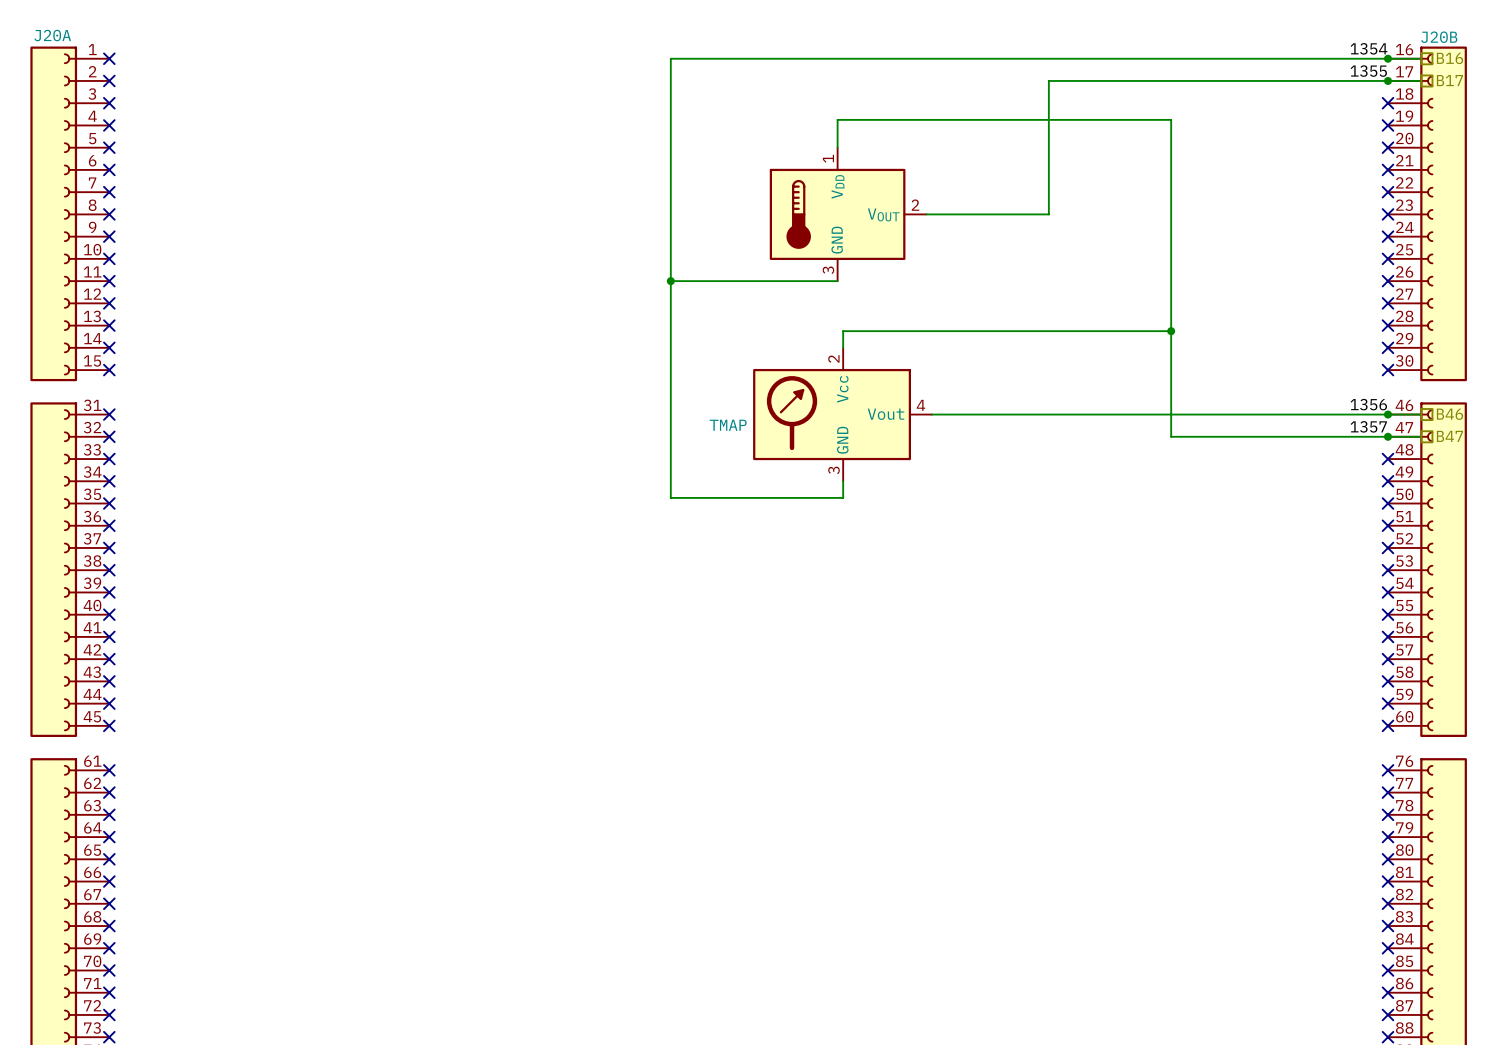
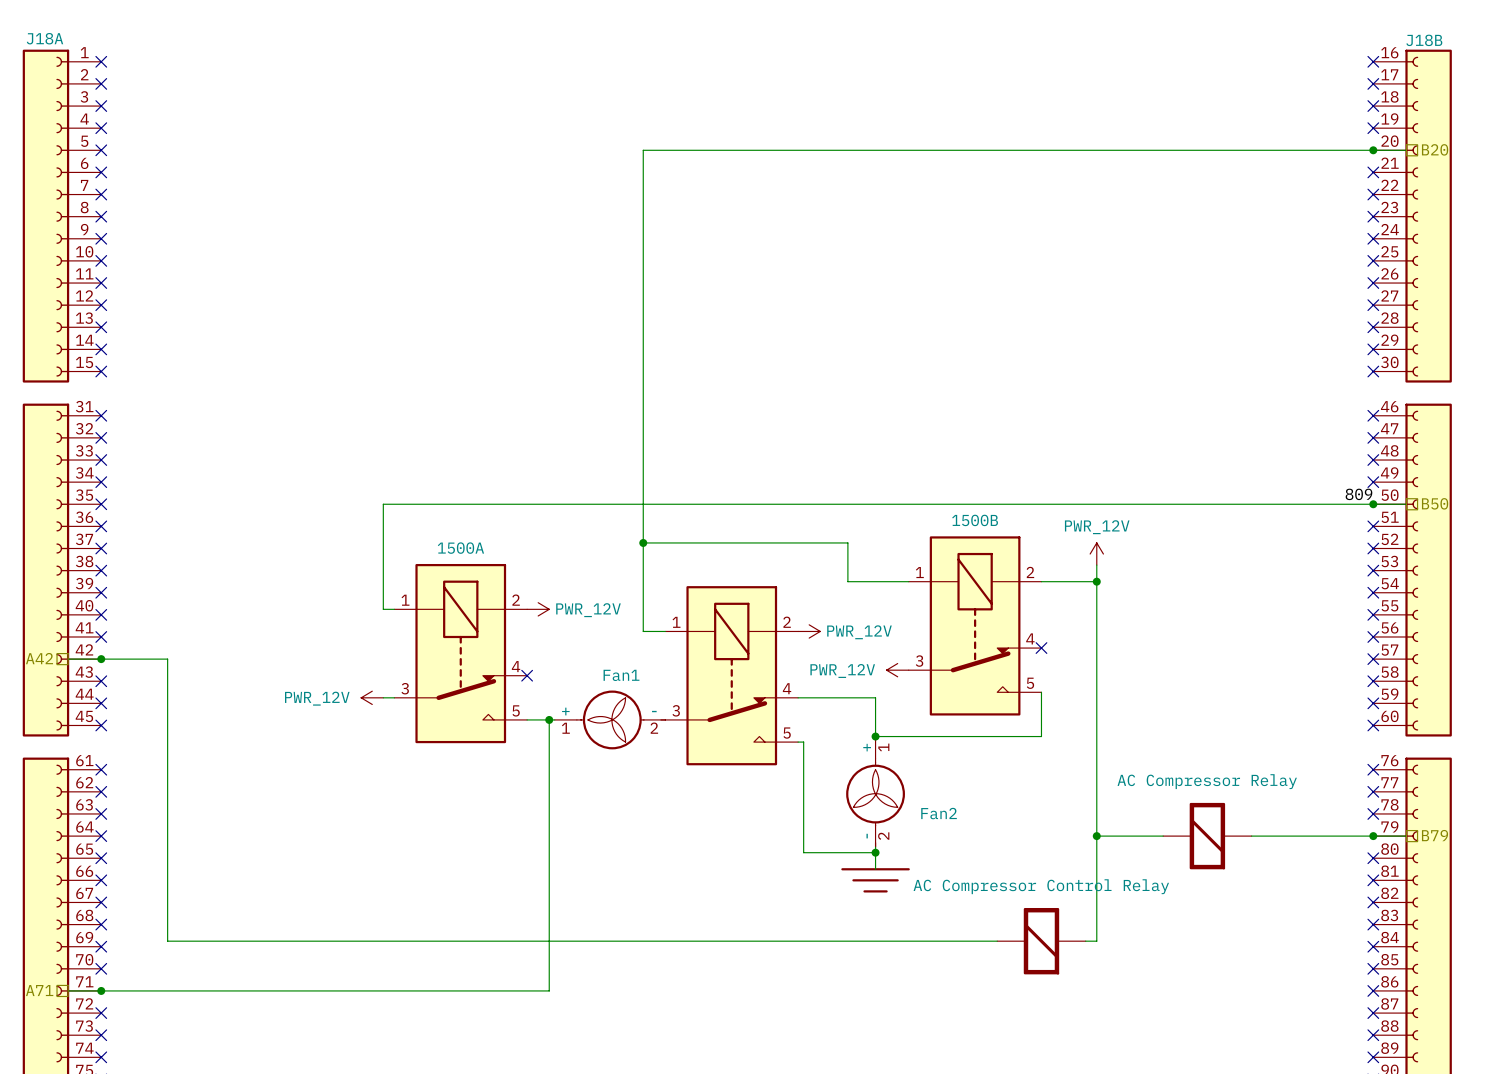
J20A name: J20A (52, 35) -> J18A (44, 38)
J20B name: J20B (1439, 37) -> J18B (1424, 40)
label: 1354 (1368, 48) -> none
junction: (1387, 58) -> none
no-connect mark: none -> (1373, 61)
wire: (1421, 58) (670, 58) (670, 497) (843, 497) (843, 481) -> none
hierarchical label: B16 (1450, 58) -> none
label: 1355 (1368, 71) -> none
junction: (1387, 80) -> none
no-connect mark: none -> (1373, 83)
wire: (1421, 80) (1048, 80) (1048, 214) (926, 214) -> none
hierarchical label: B17 (1449, 80) -> none
wire: (837, 147) (837, 119) (1171, 119) (1171, 436) (1421, 436) -> none
junction: none -> (1373, 150)
no-connect mark: (1387, 147) -> none
wire: none -> (1406, 150) (643, 150) (643, 631) (665, 631)
hierarchical label: none -> B20 (1435, 149)
part: (848, 214) -> none
wire: (670, 281) (837, 281) -> none
junction: (670, 281) -> none
wire: (1171, 331) (843, 331) (843, 347) -> none
junction: (1171, 331) -> none
label: 1356 (1368, 404) -> none
part: TMAP (842, 414) -> none
wire: (932, 414) (1421, 414) -> none
junction: (1387, 414) -> none
no-connect mark: none -> (1373, 415)
hierarchical label: B46 (1450, 414) -> none
label: 1357 (1368, 426) -> none
junction: (1387, 436) -> none
no-connect mark: none -> (1373, 437)
hierarchical label: B47 (1449, 436) -> none
label: none -> 809 (1358, 494)
junction: none -> (1373, 504)
no-connect mark: (1387, 503) -> none
wire: none -> (1406, 504) (383, 504) (383, 609) (394, 609)
hierarchical label: none -> B50 (1435, 503)
wire: none -> (643, 542) (847, 542) (847, 581) (908, 581)
junction: none -> (643, 542)
power symbol: none -> PWR_12V (1096, 554)
wire: none -> (1096, 565) (1096, 941) (1085, 941)
wire: none -> (1041, 581) (1096, 581)
junction: none -> (1096, 581)
power symbol: none -> PWR_12V (538, 609)
part: none -> 1500B (975, 625)
power symbol: none -> PWR_12V (809, 631)
no-connect mark: none -> (1041, 648)
part: none -> 1500A (460, 653)
hierarchical label: none -> A42 (39, 658)
wire: none -> (68, 659) (167, 659) (167, 941) (997, 941)
junction: none -> (101, 659)
no-connect mark: (109, 659) -> none
power symbol: none -> PWR_12V (897, 670)
no-connect mark: none -> (527, 675)
part: none -> (731, 675)
wire: none -> (1041, 692) (1041, 736) (875, 736) (875, 697) (798, 697)
power symbol: none -> PWR_12V (372, 697)
wire: none -> (383, 697) (394, 697)
wire: none -> (527, 719) (554, 719)
wire: none -> (549, 719) (549, 990) (68, 990)
junction: none -> (549, 719)
part: none -> Fan1 (610, 719)
junction: none -> (875, 736)
wire: none -> (798, 742) (803, 742) (803, 852) (875, 852)
part: none -> Fan2 (875, 791)
hierarchical label: none -> B79 (1435, 835)
wire: none -> (1096, 836) (1163, 836)
junction: none -> (1096, 836)
part: none -> AC Compressor Relay (1207, 836)
wire: none -> (1251, 836) (1406, 836)
junction: none -> (1373, 836)
no-connect mark: (1387, 837) -> none
wire: none -> (875, 847) (875, 869)
junction: none -> (875, 852)
power symbol: none -> (875, 880)
part: none -> AC Compressor Control Relay (1041, 941)
hierarchical label: none -> A71 (39, 990)
junction: none -> (101, 990)
no-connect mark: (109, 992) -> none

